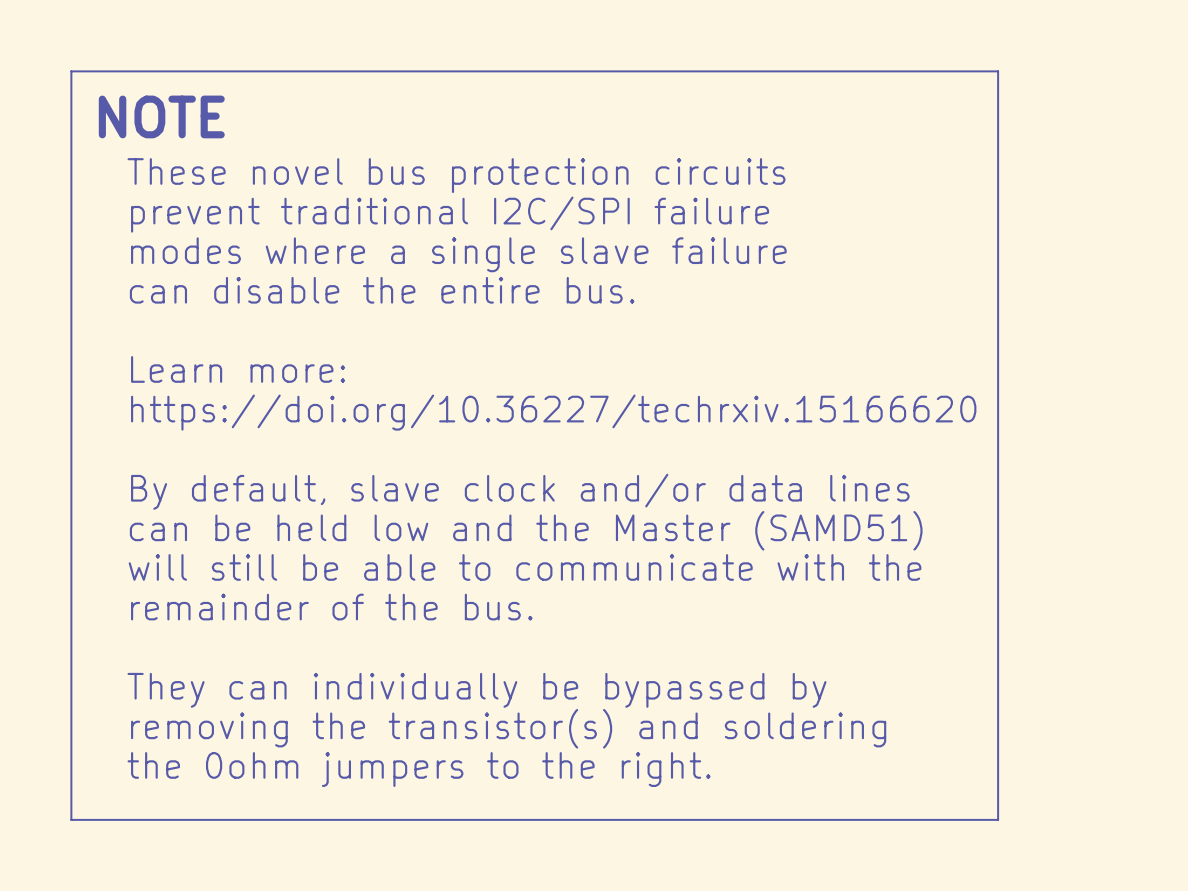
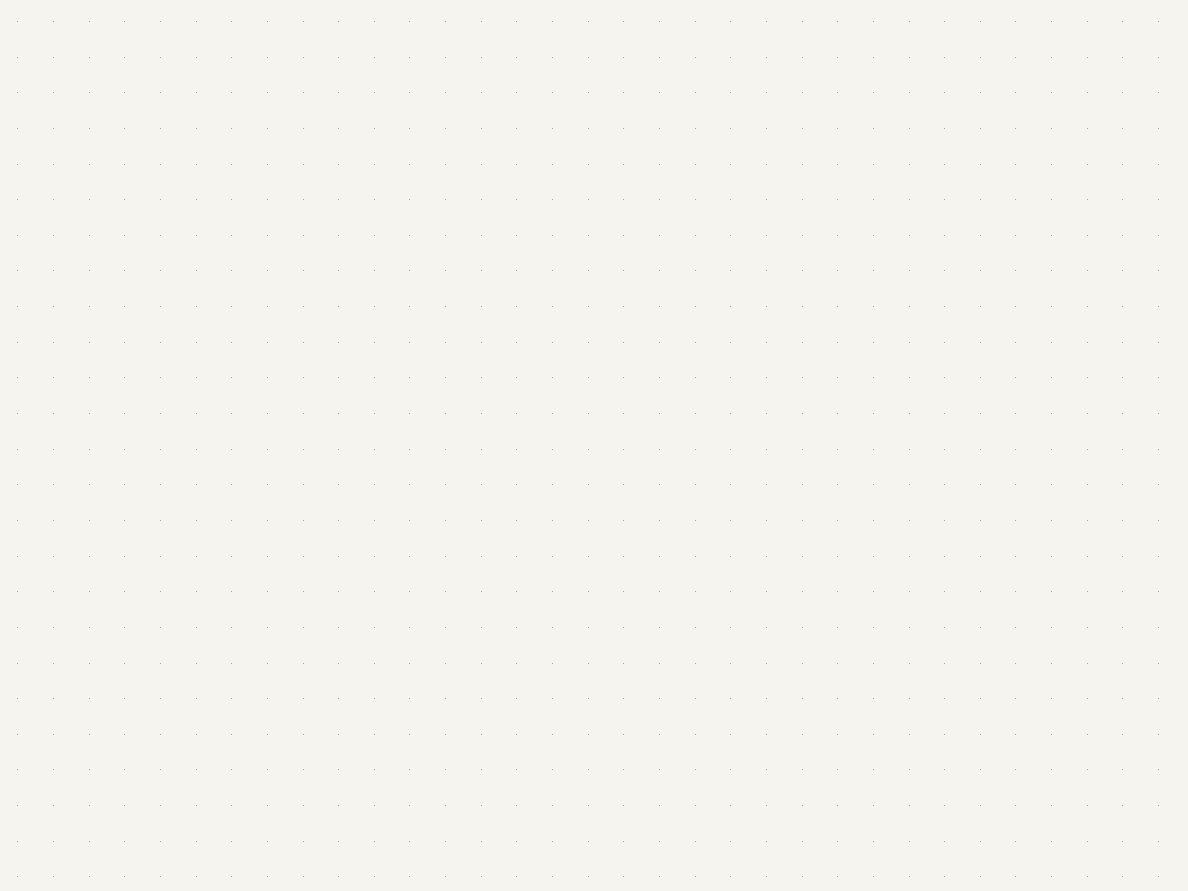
line: (71, 71) (71, 819) (998, 819) (998, 71) (71, 71) -> none
text: NOTE (161, 116) -> none
text: These novel bus protection circuits (456, 175) -> none
text: prevent traditional I2C/SPI failure (450, 214) -> none
text: modes where a single slave failure (458, 254) -> none
text: can disable the entire bus. (382, 290) -> none
text: Learn more: (238, 369) -> none
text: https://doi.org/10.36227/techrxiv.15166620 (553, 412) -> none
text: By default, slave clock and/or data lines (520, 491) -> none
text: can be held low and the Master (SAMD51) (526, 530) -> none
text: will still be able to communicate with the (525, 567) -> none
text: remainder of the bus. (331, 607) -> none
text: They can individually be bypassed by (477, 690) -> none
text: removing the transistor(s) and soldering (508, 728) -> none
text: the 0ohm jumpers to the right. (419, 769) -> none

